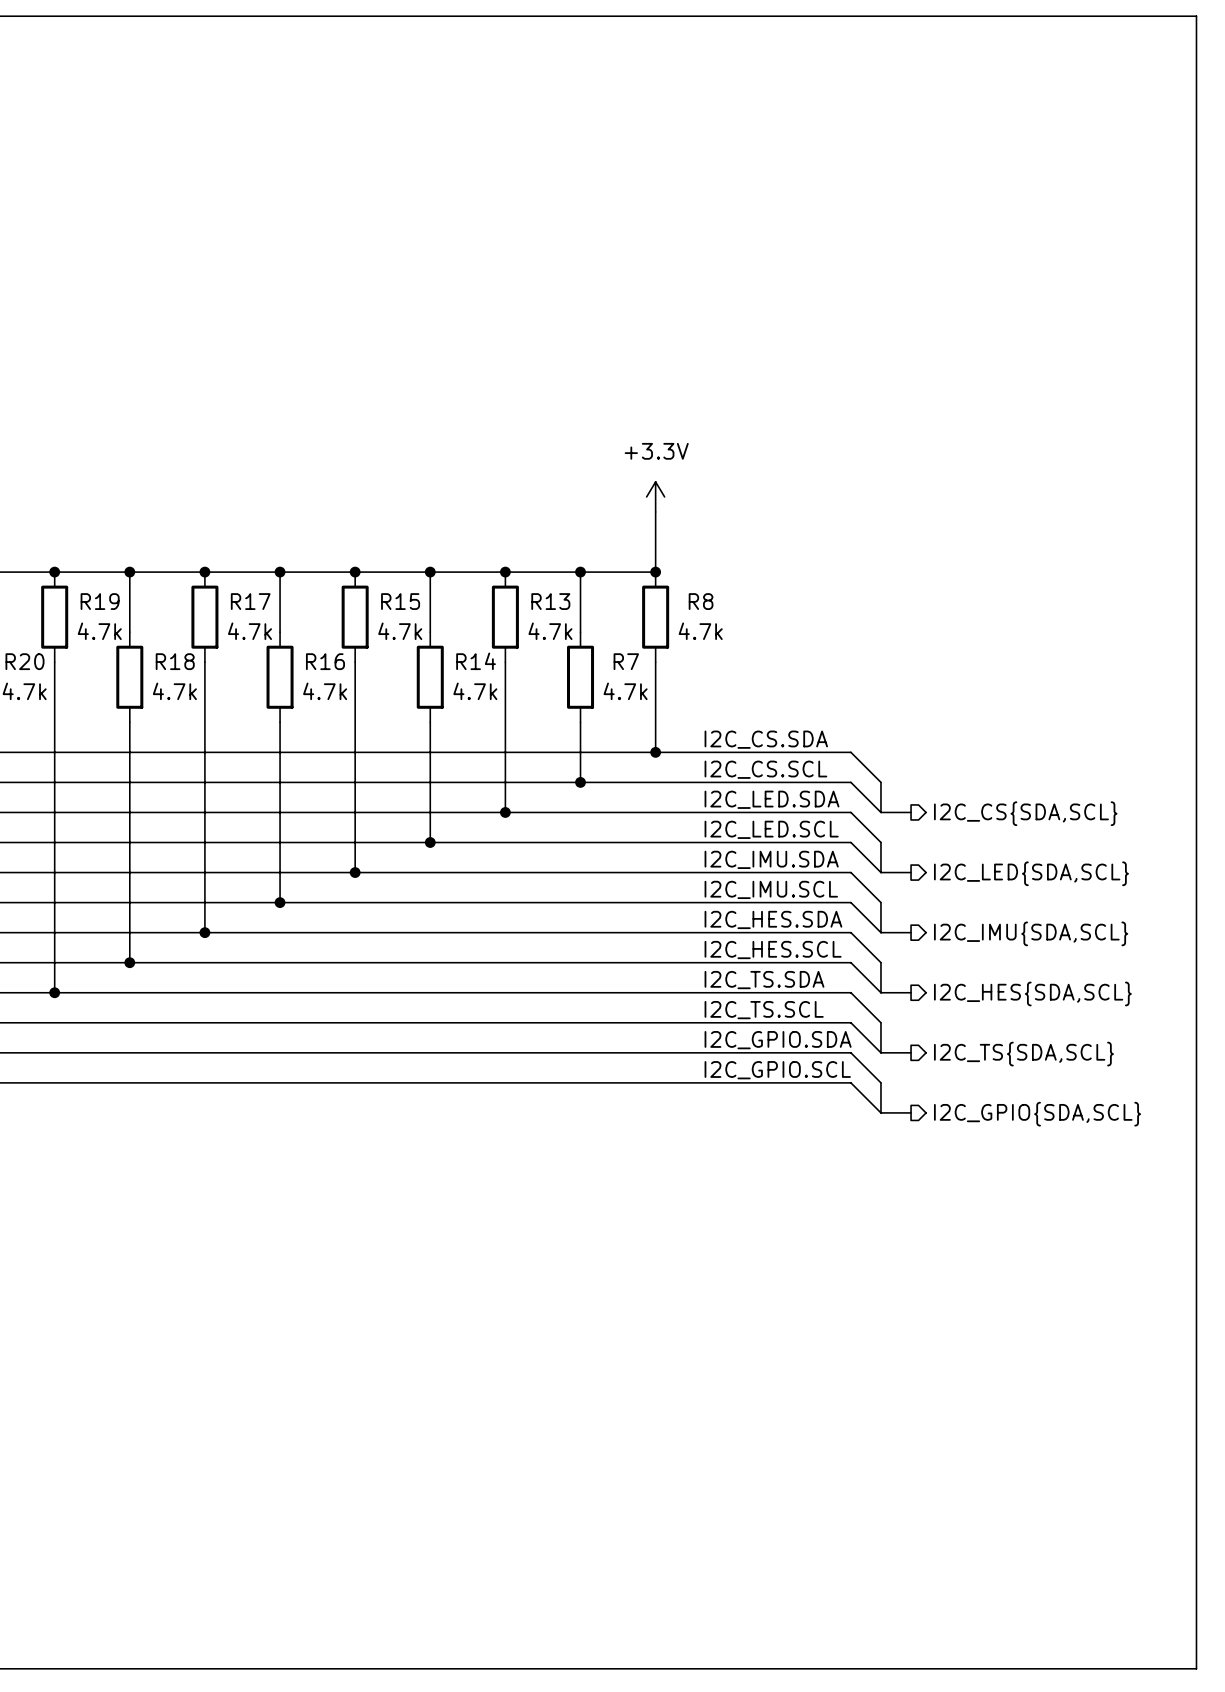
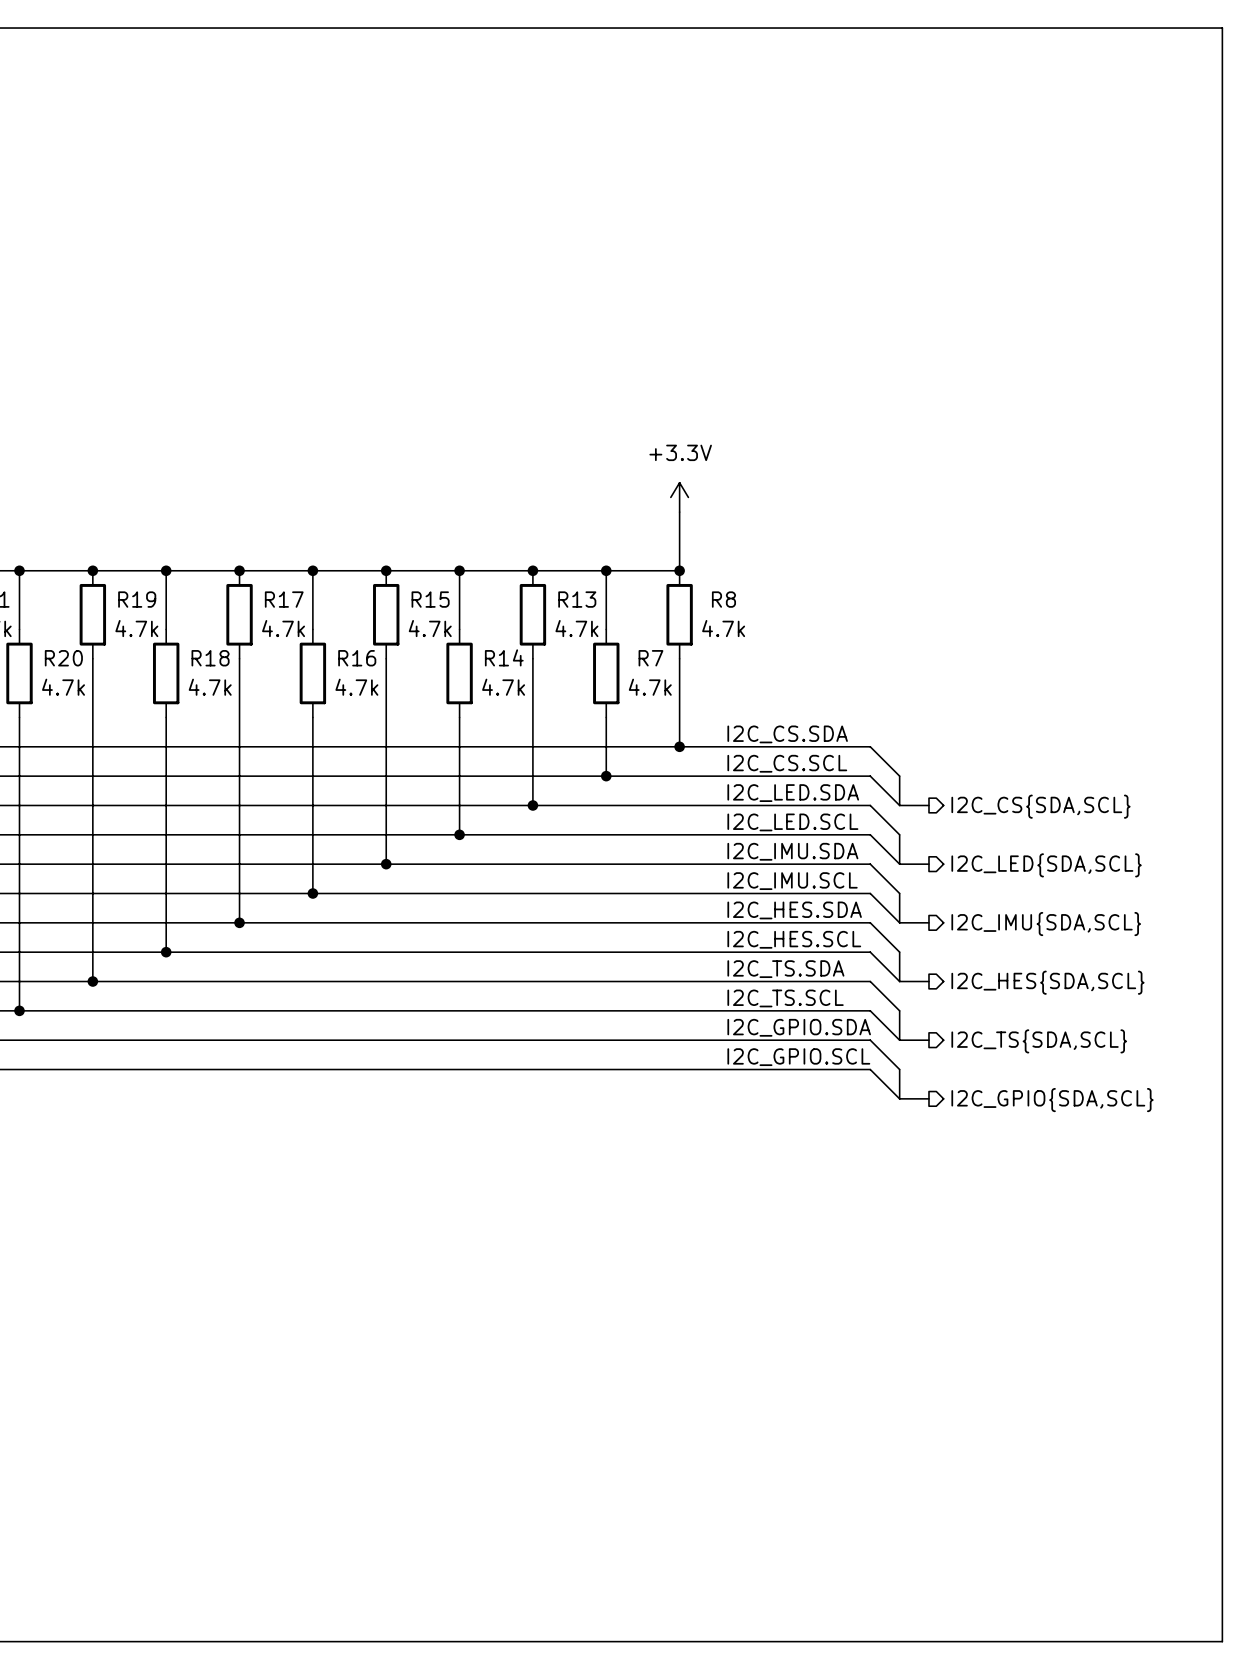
line: (1196, 16) (1196, 1668) -> (1207, 28) (1222, 28) (1222, 1641) (1207, 1641)

